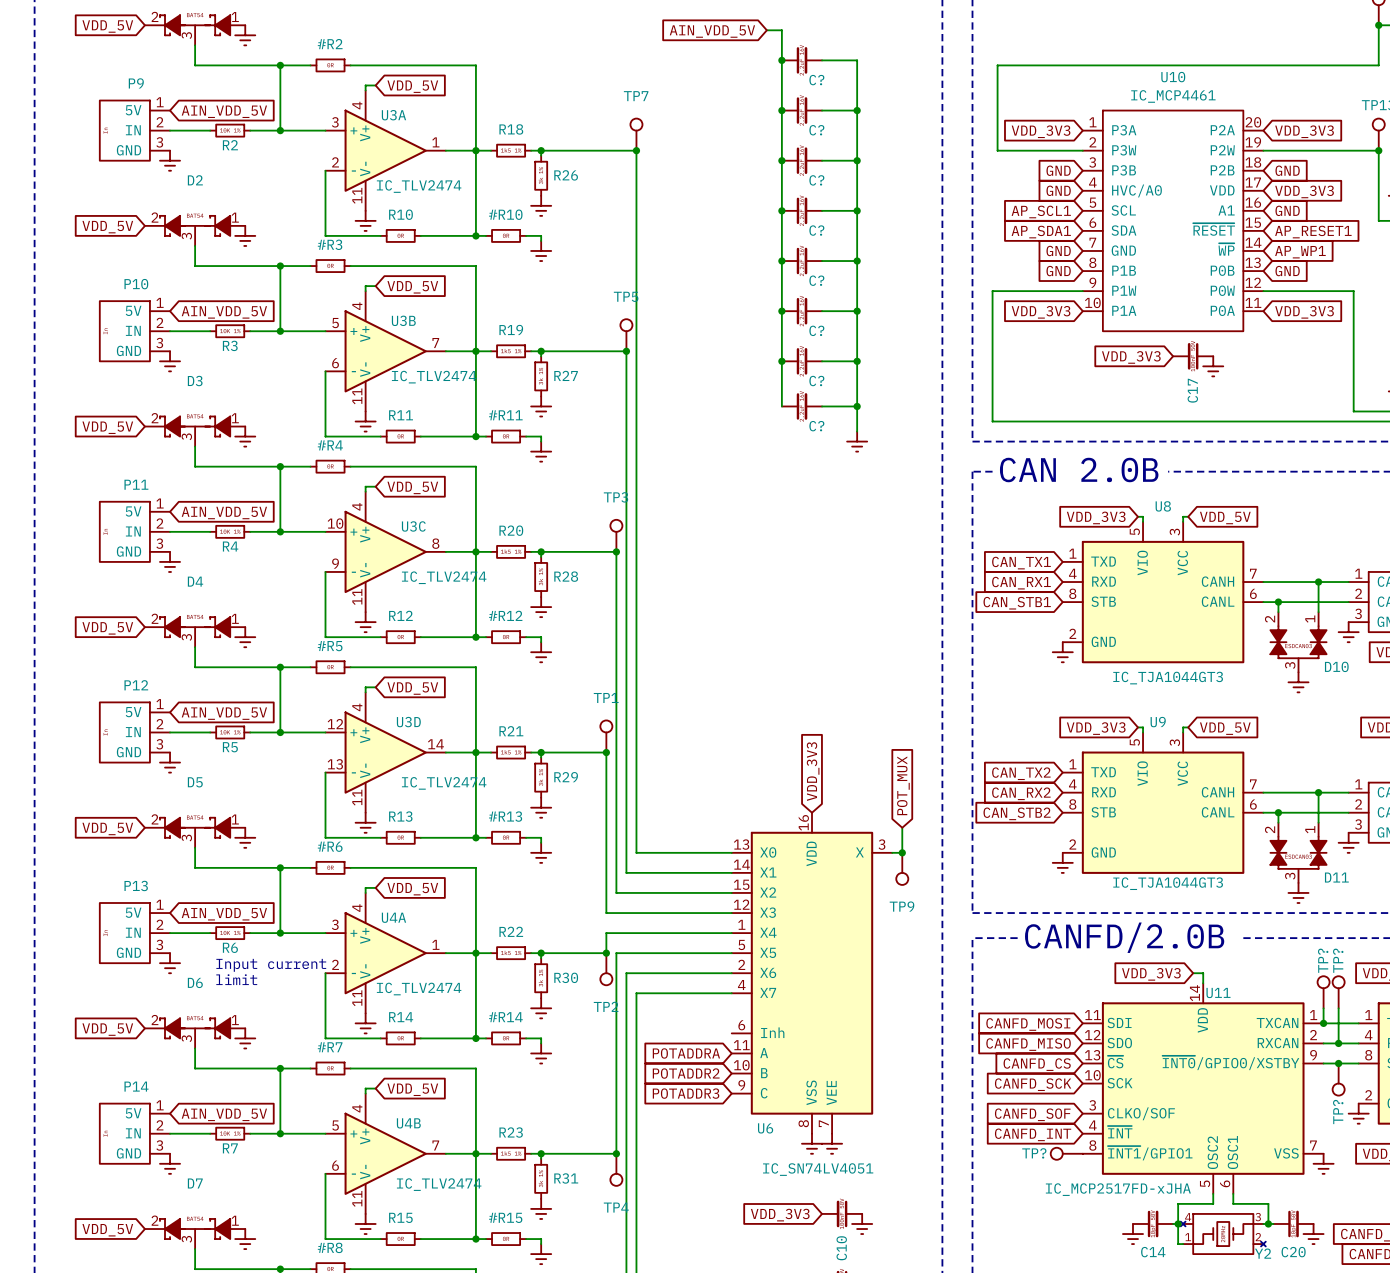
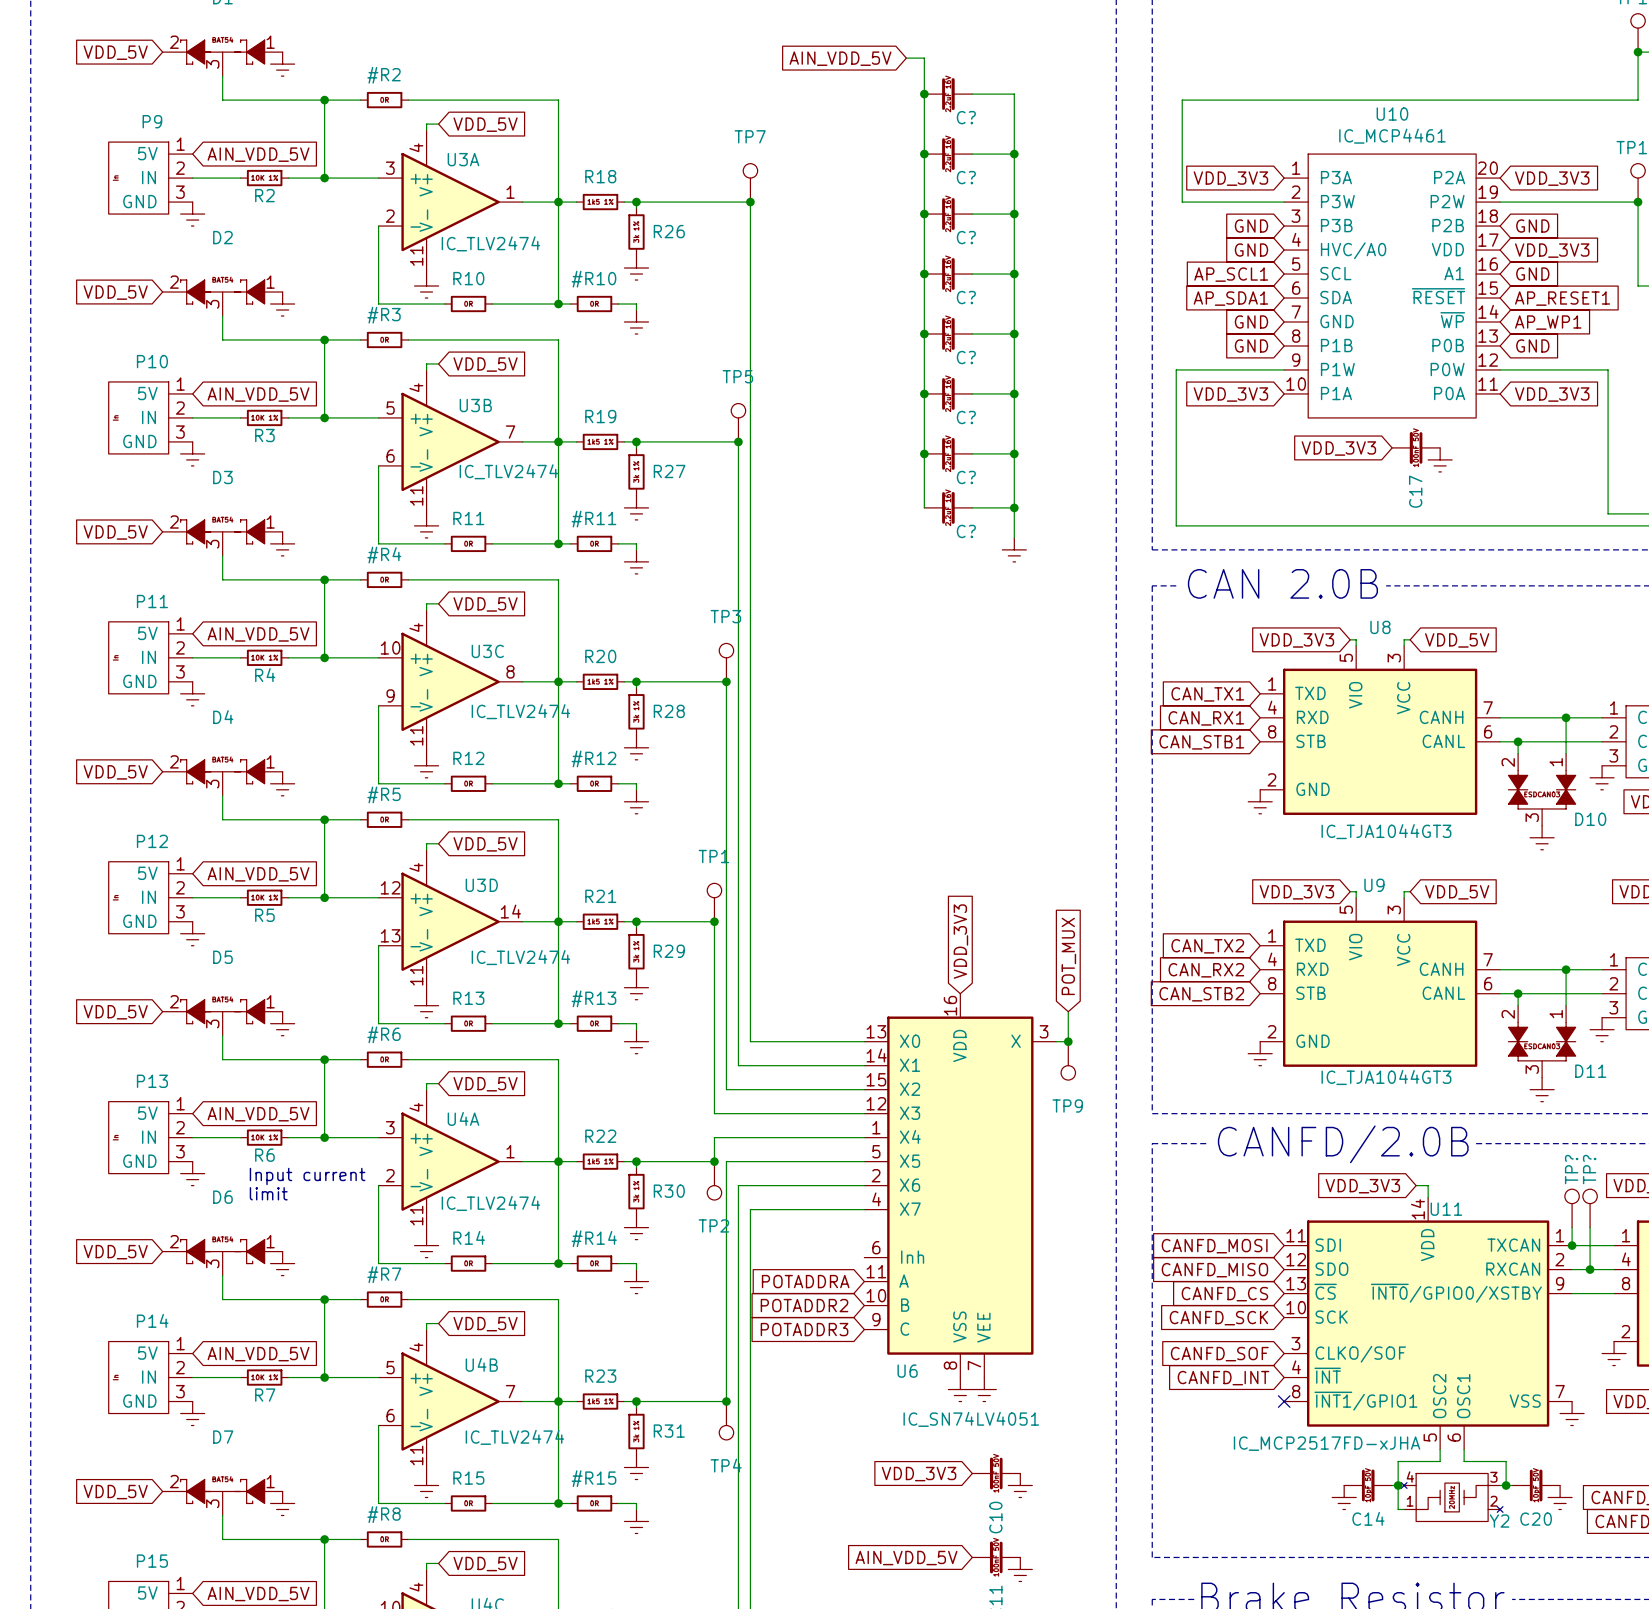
junction: (1338, 1063) -> none
TP?: (1338, 1079) -> none
TP?: (1066, 1153) -> none
no-connect mark: none -> (1284, 1401)

